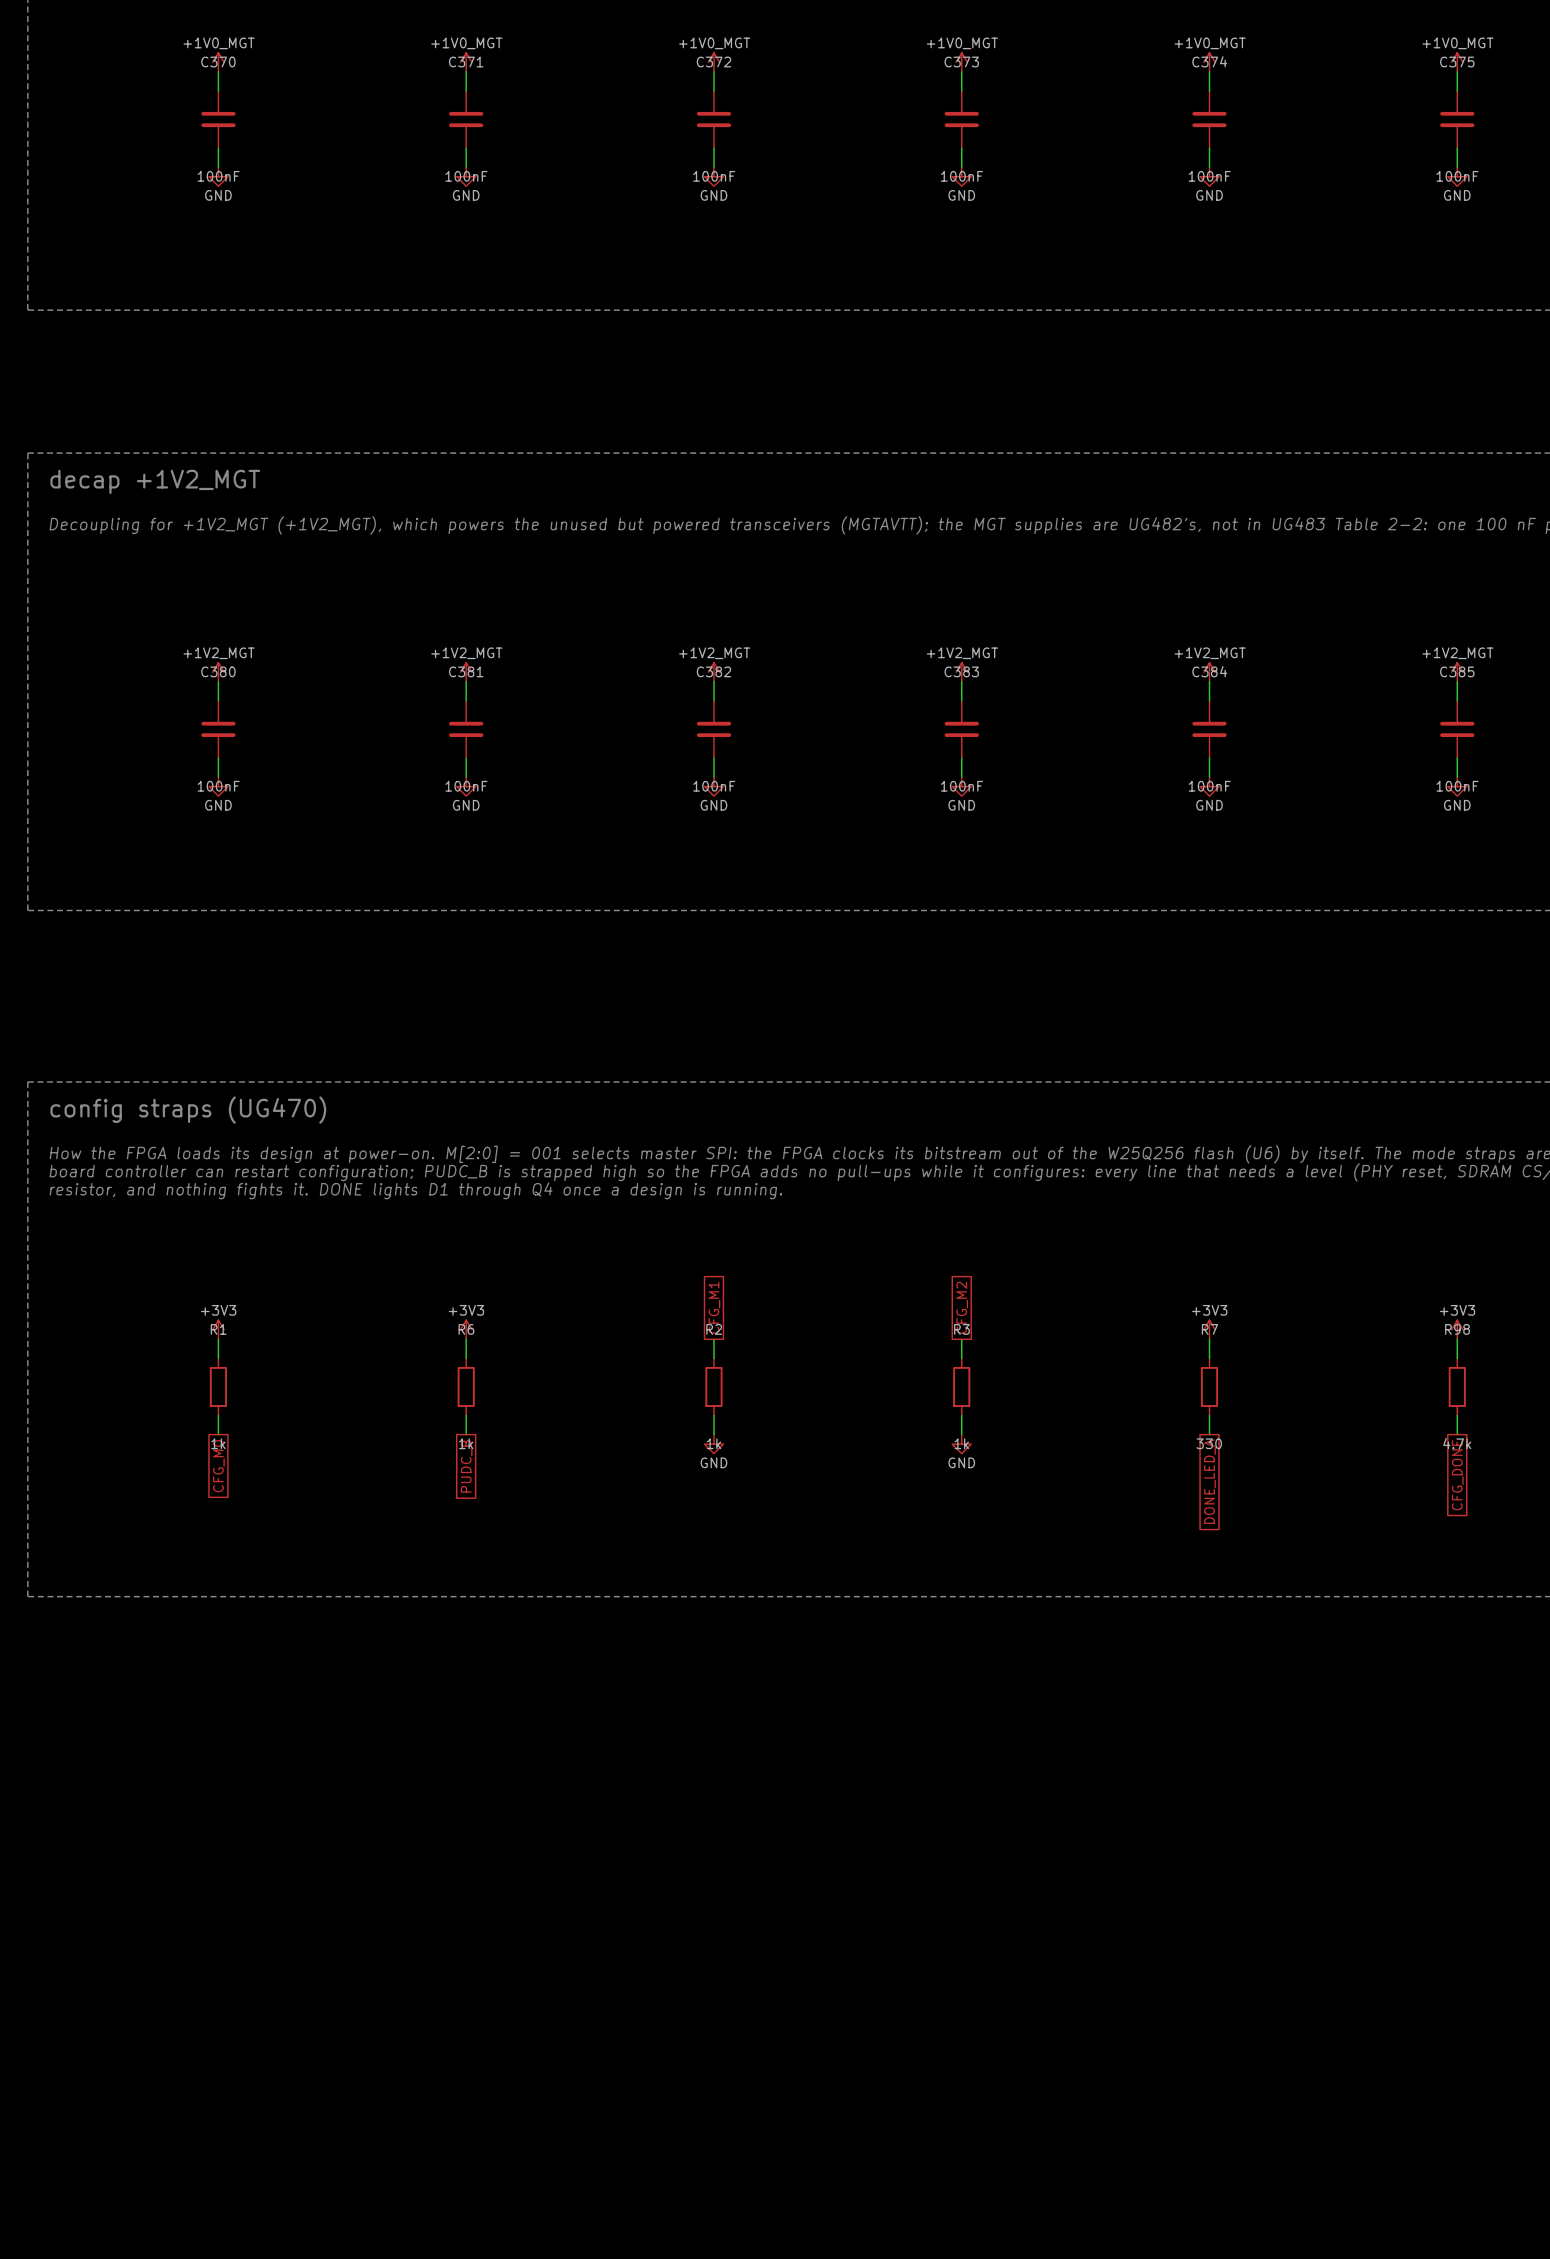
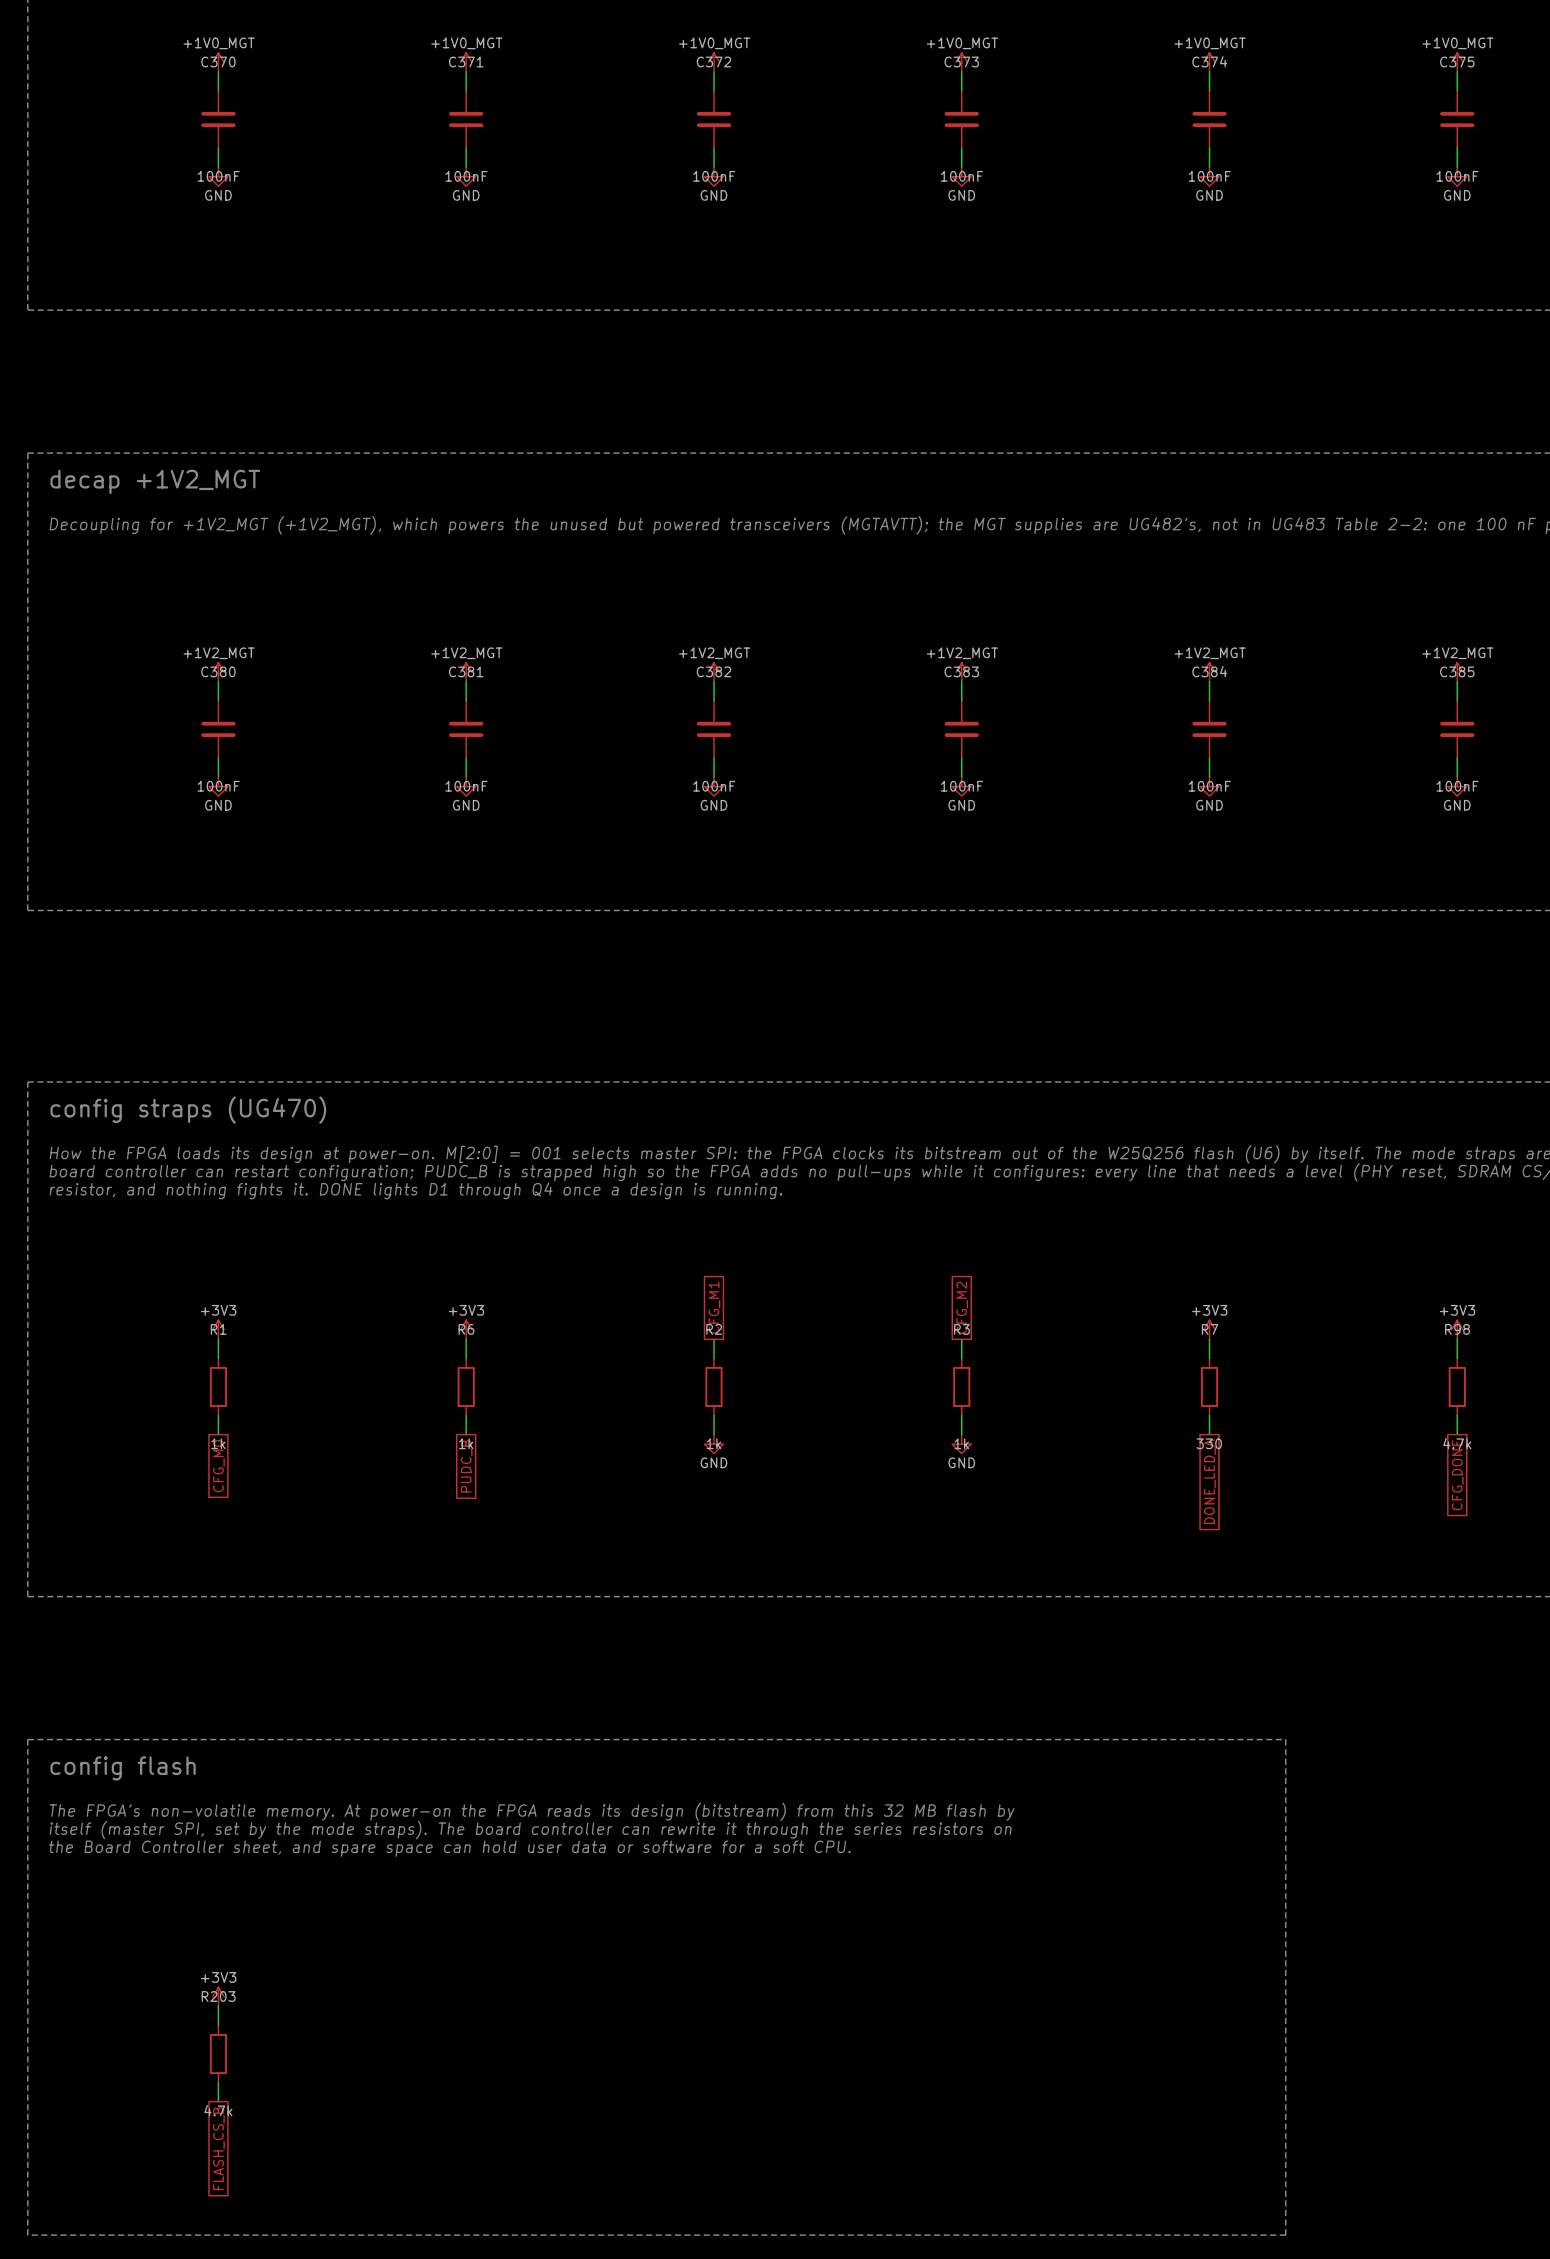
line: none -> (27, 1739) (1285, 1739) (1285, 2235) (27, 2235) (27, 1739)
text: none -> config flash (123, 1768)
text: none -> The FPGA's non-volatile memory. At power-on the FPGA reads its design (bitstream) from this 32 MB flash by (532, 1811)
text: none -> itself (master SPI, set by the mode straps). The board controller can rewrite it through the series resistors on (530, 1830)
text: none -> the Board Controller sheet, and spare space can hold user data or software for a soft CPU. (449, 1848)
power symbol: none -> +3V3 (218, 1996)
wire: none -> (218, 2006) (218, 2025)
R203: none -> 4.7k (218, 2054)
wire: none -> (218, 2082) (218, 2101)
global label: none -> FLASH_CS_B (218, 2148)

